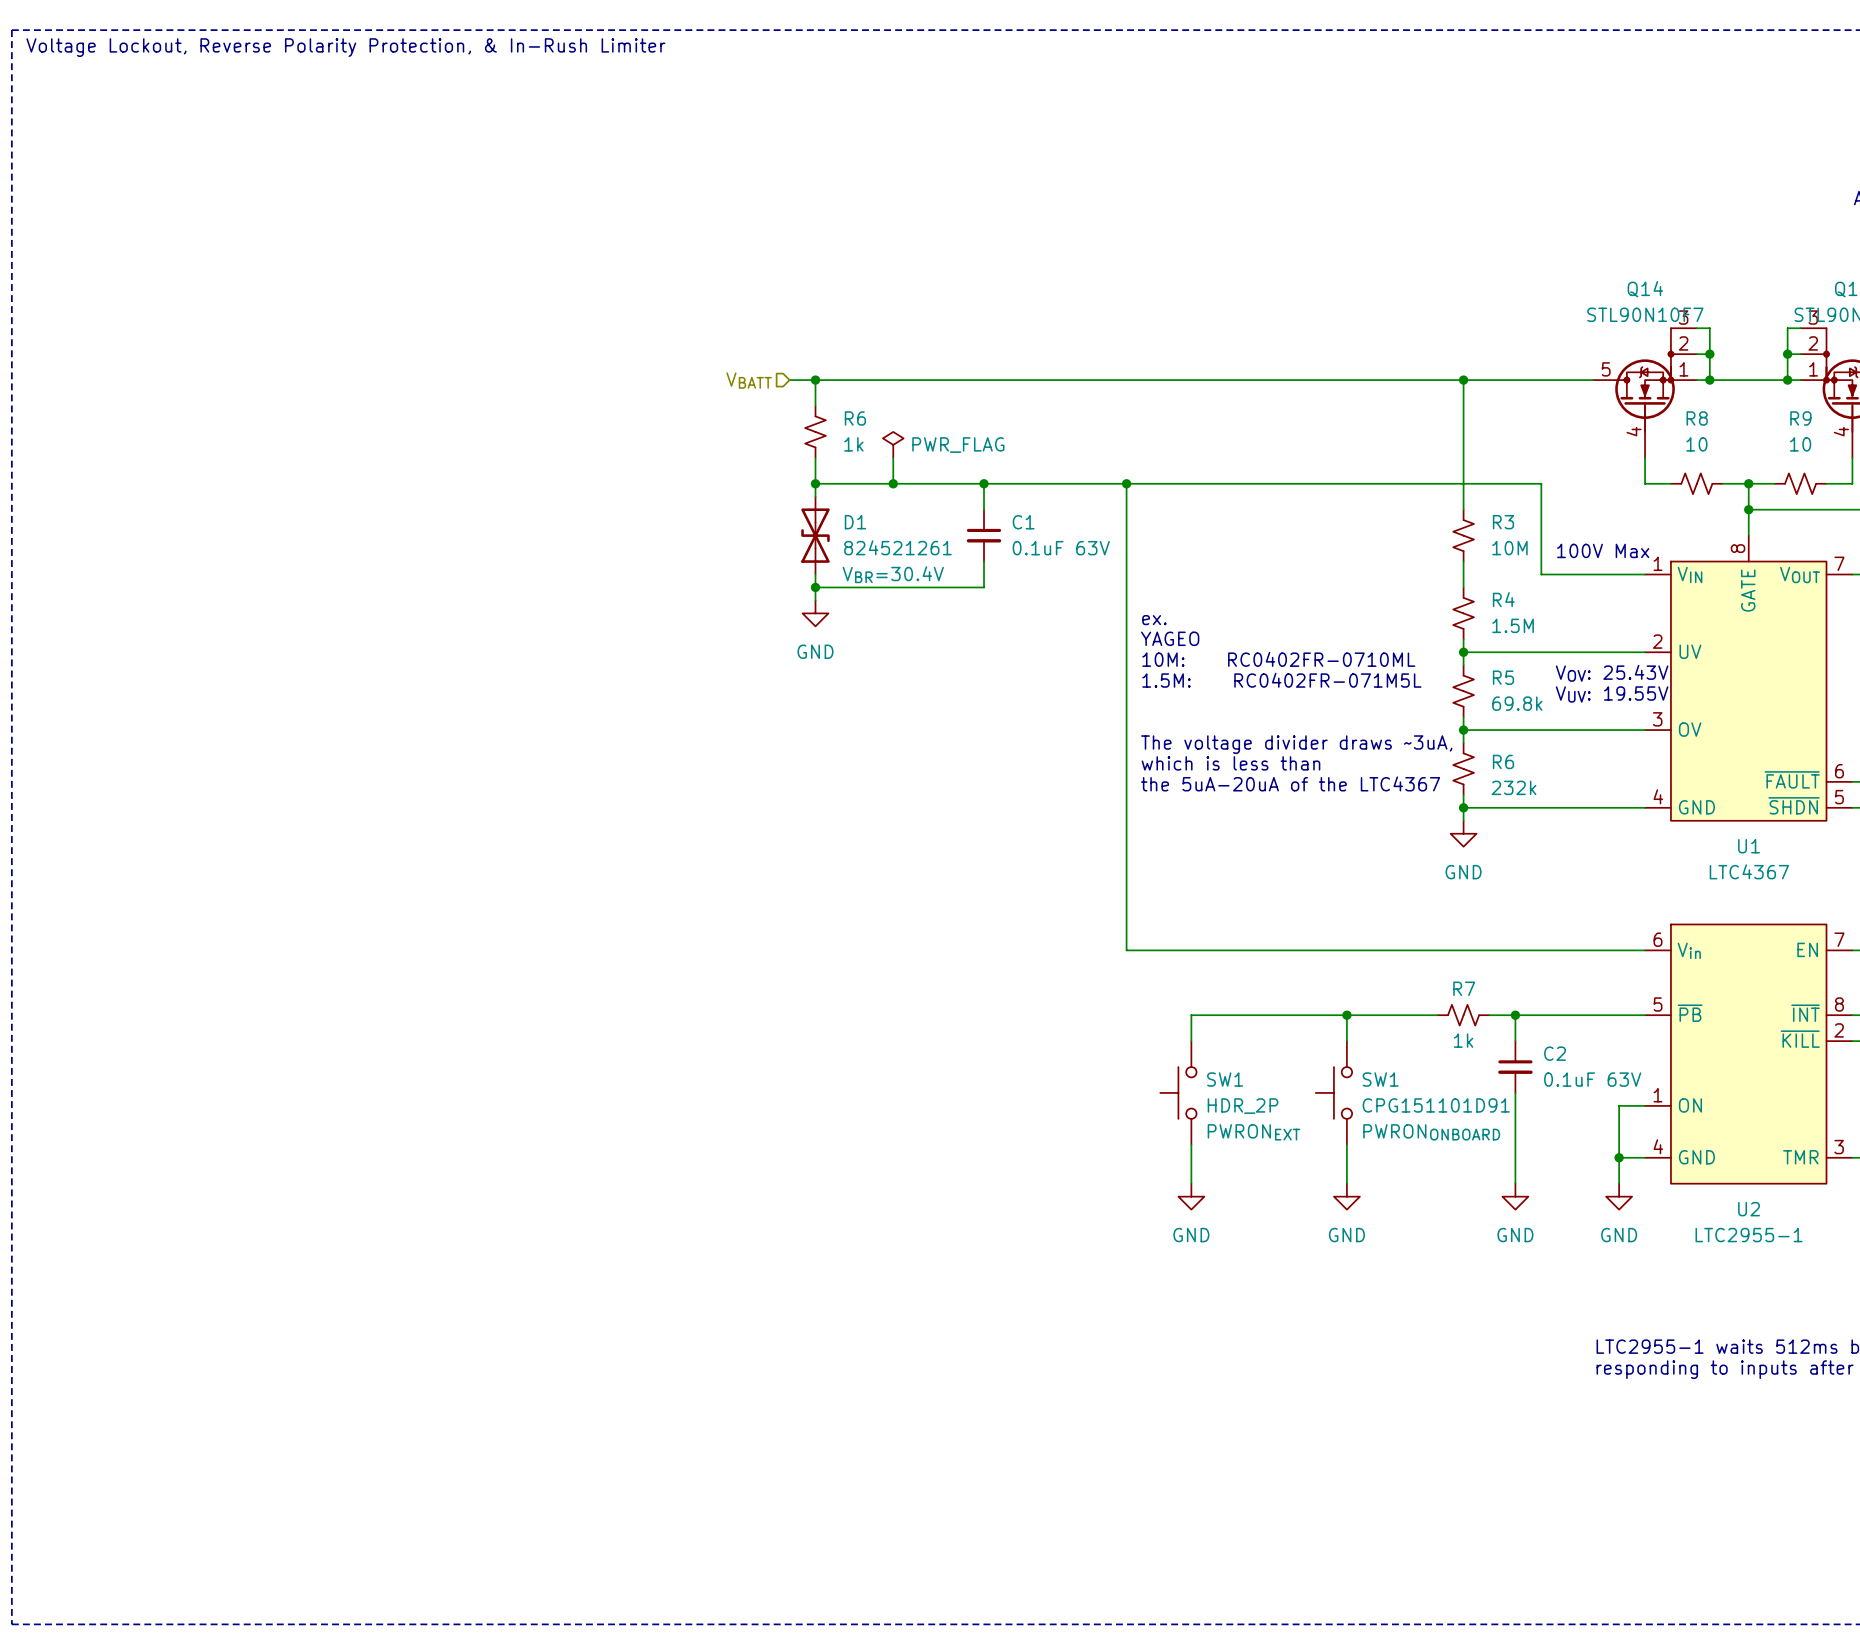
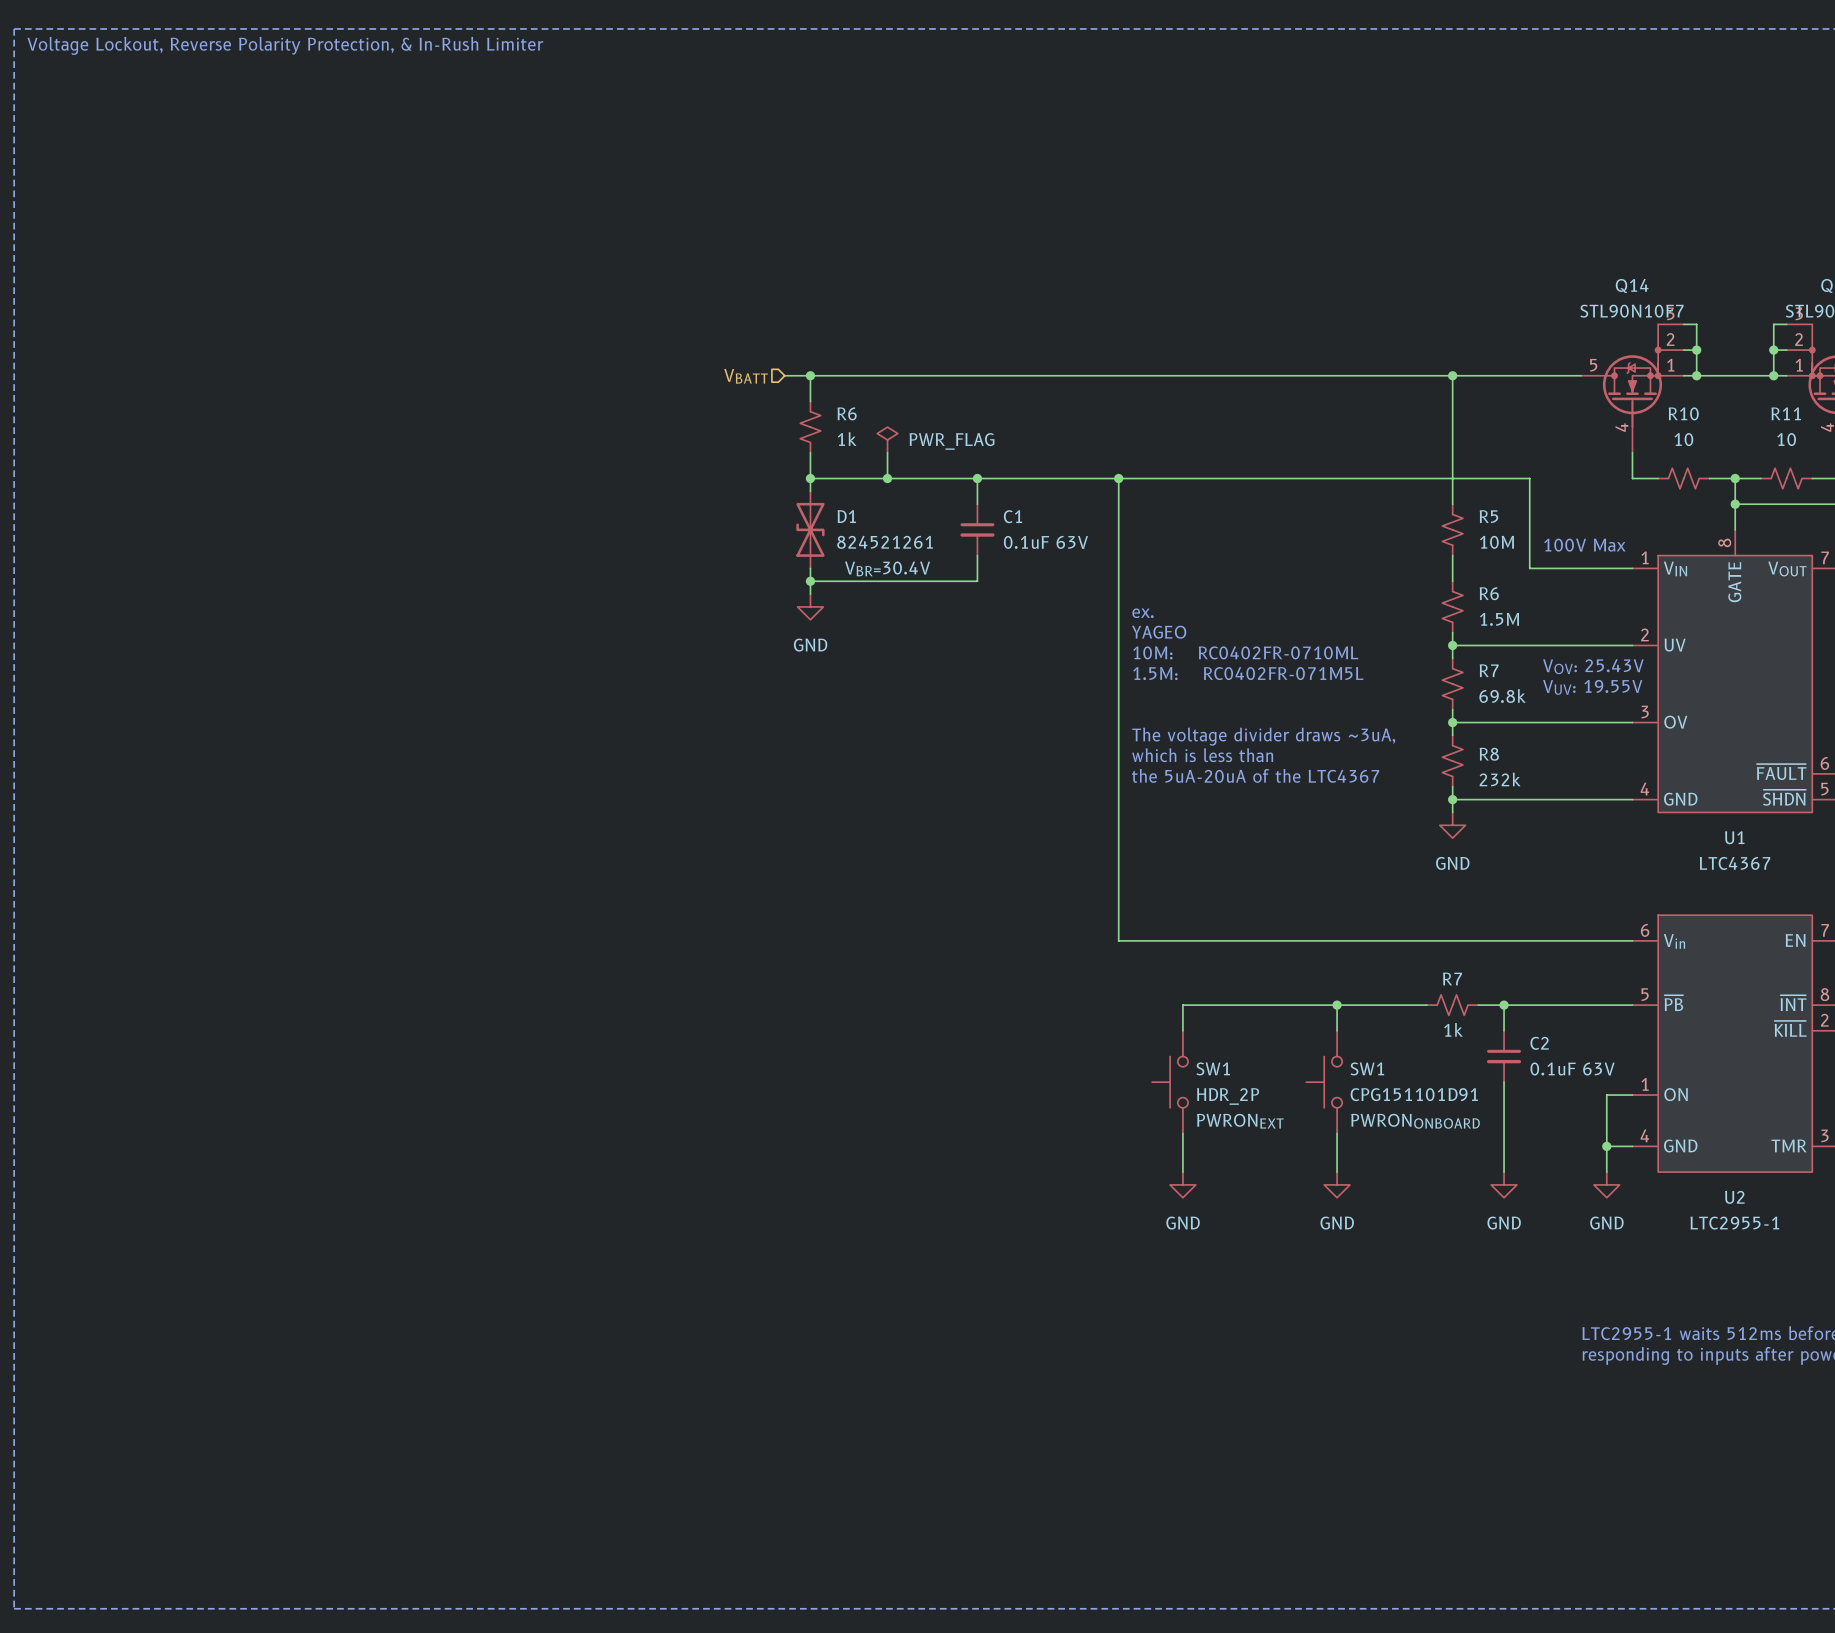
R8 name: R8 (1697, 418) -> R10 (1683, 413)
R9 name: R9 (1800, 418) -> R11 (1786, 413)
R3 name: R3 (1503, 522) -> R5 (1488, 516)
R4 name: R4 (1503, 599) -> R6 (1489, 593)
R5 name: R5 (1503, 677) -> R7 (1489, 670)
R6 name: R6 (1503, 761) -> R8 (1489, 754)

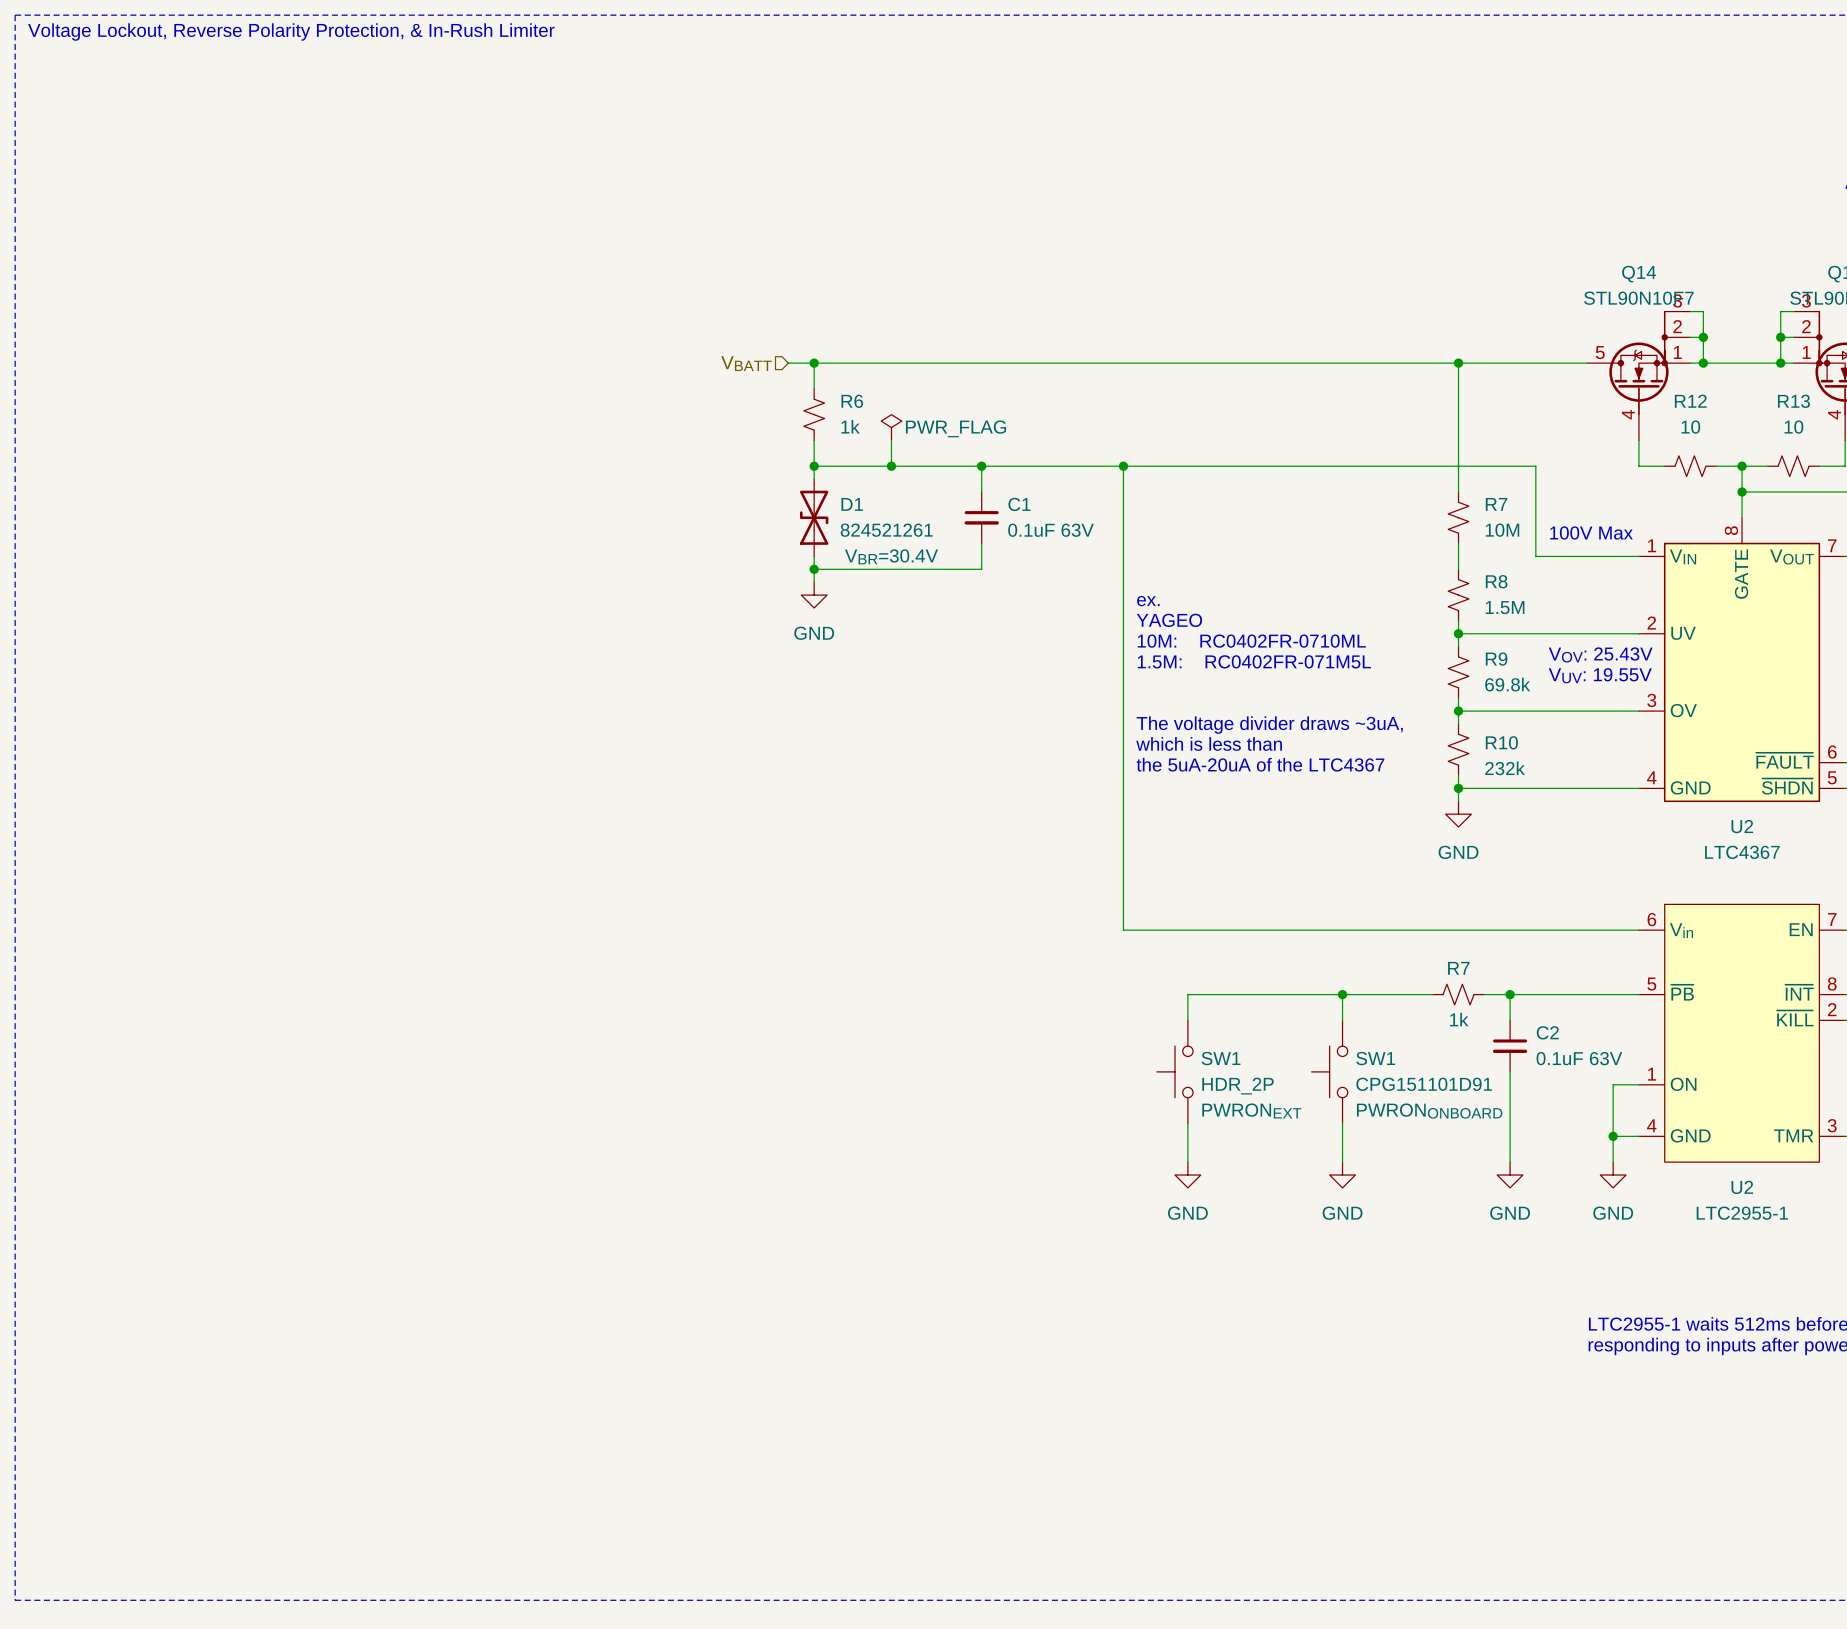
R10 name: R10 (1683, 413) -> R12 (1690, 401)
R11 name: R11 (1786, 413) -> R13 (1793, 401)
R5 name: R5 (1488, 516) -> R7 (1496, 504)
R6 name: R6 (1489, 593) -> R8 (1496, 581)
R7 name: R7 (1489, 670) -> R9 (1496, 659)
R8 name: R8 (1489, 754) -> R10 (1501, 742)
U1 name: U1 (1734, 837) -> U2 (1742, 826)

